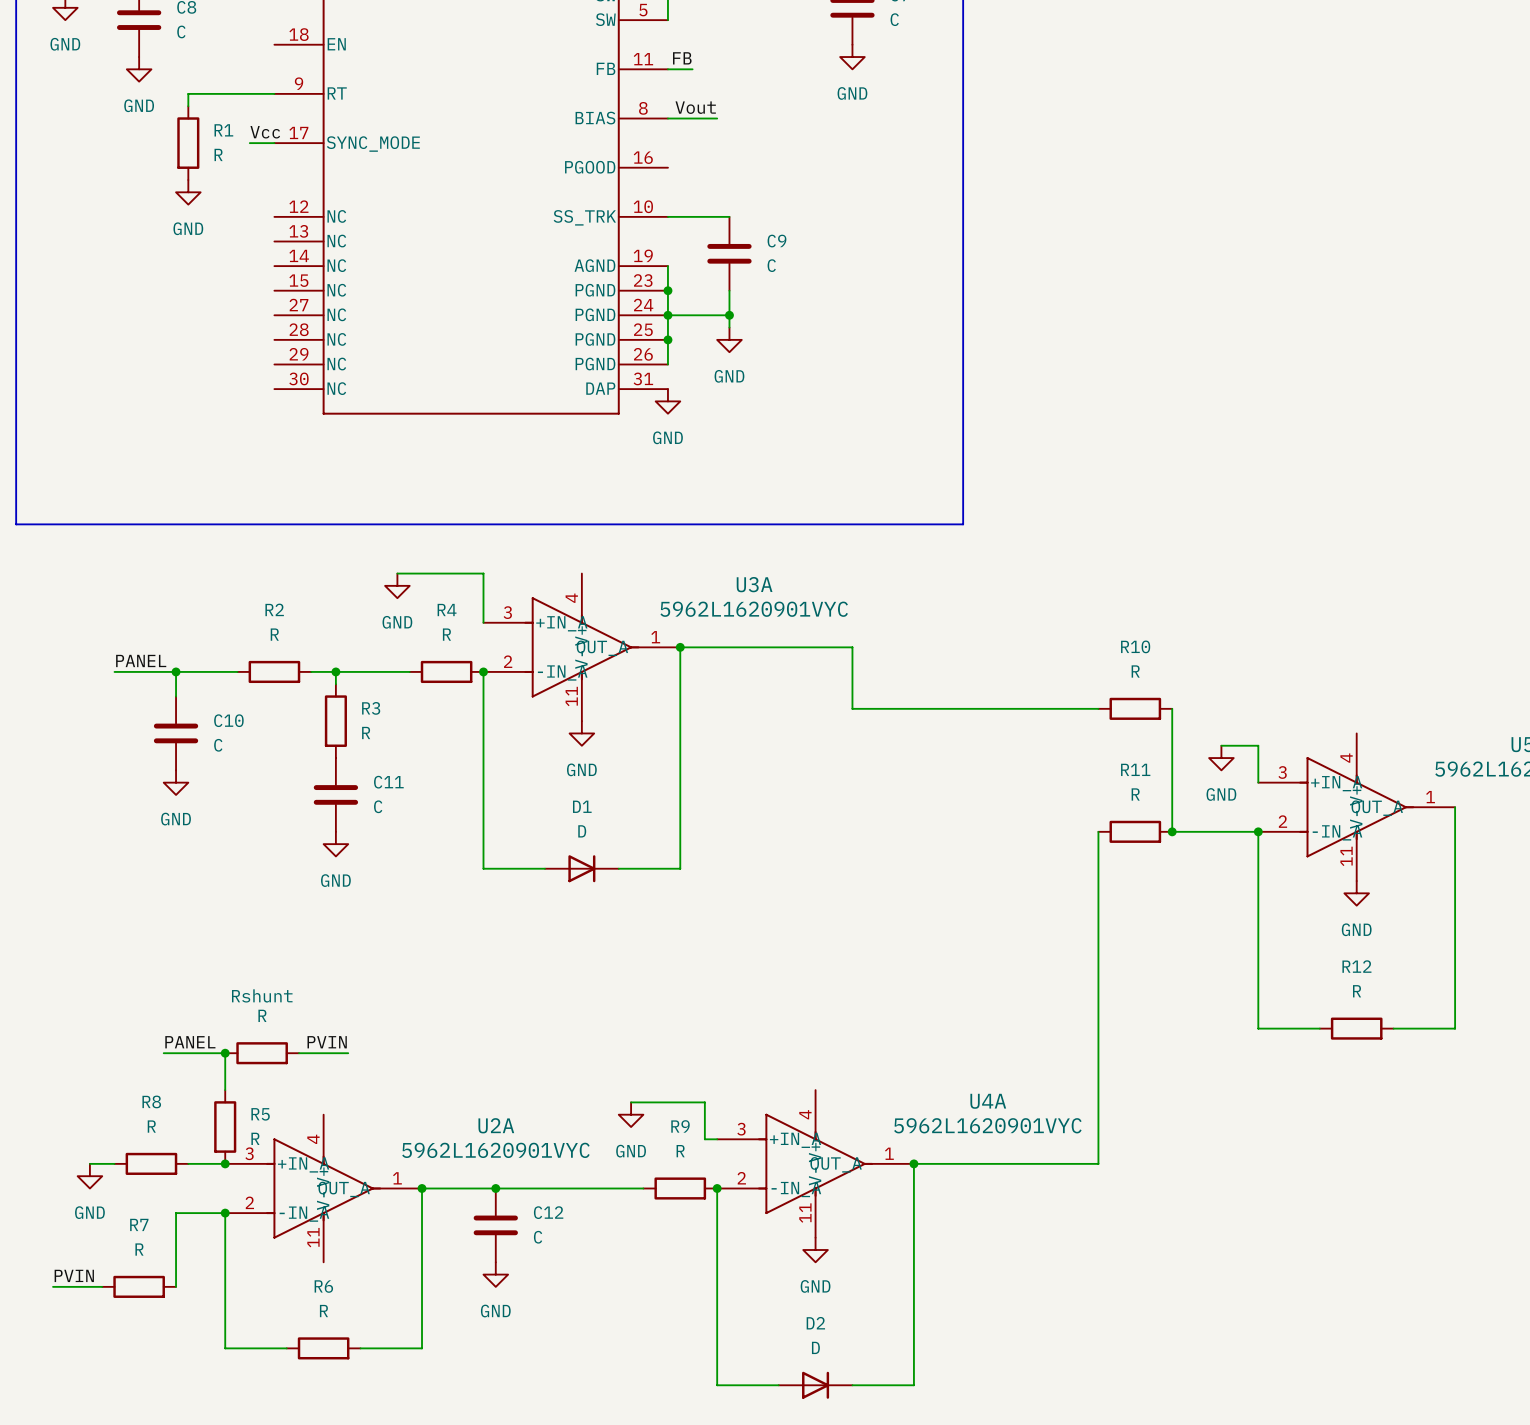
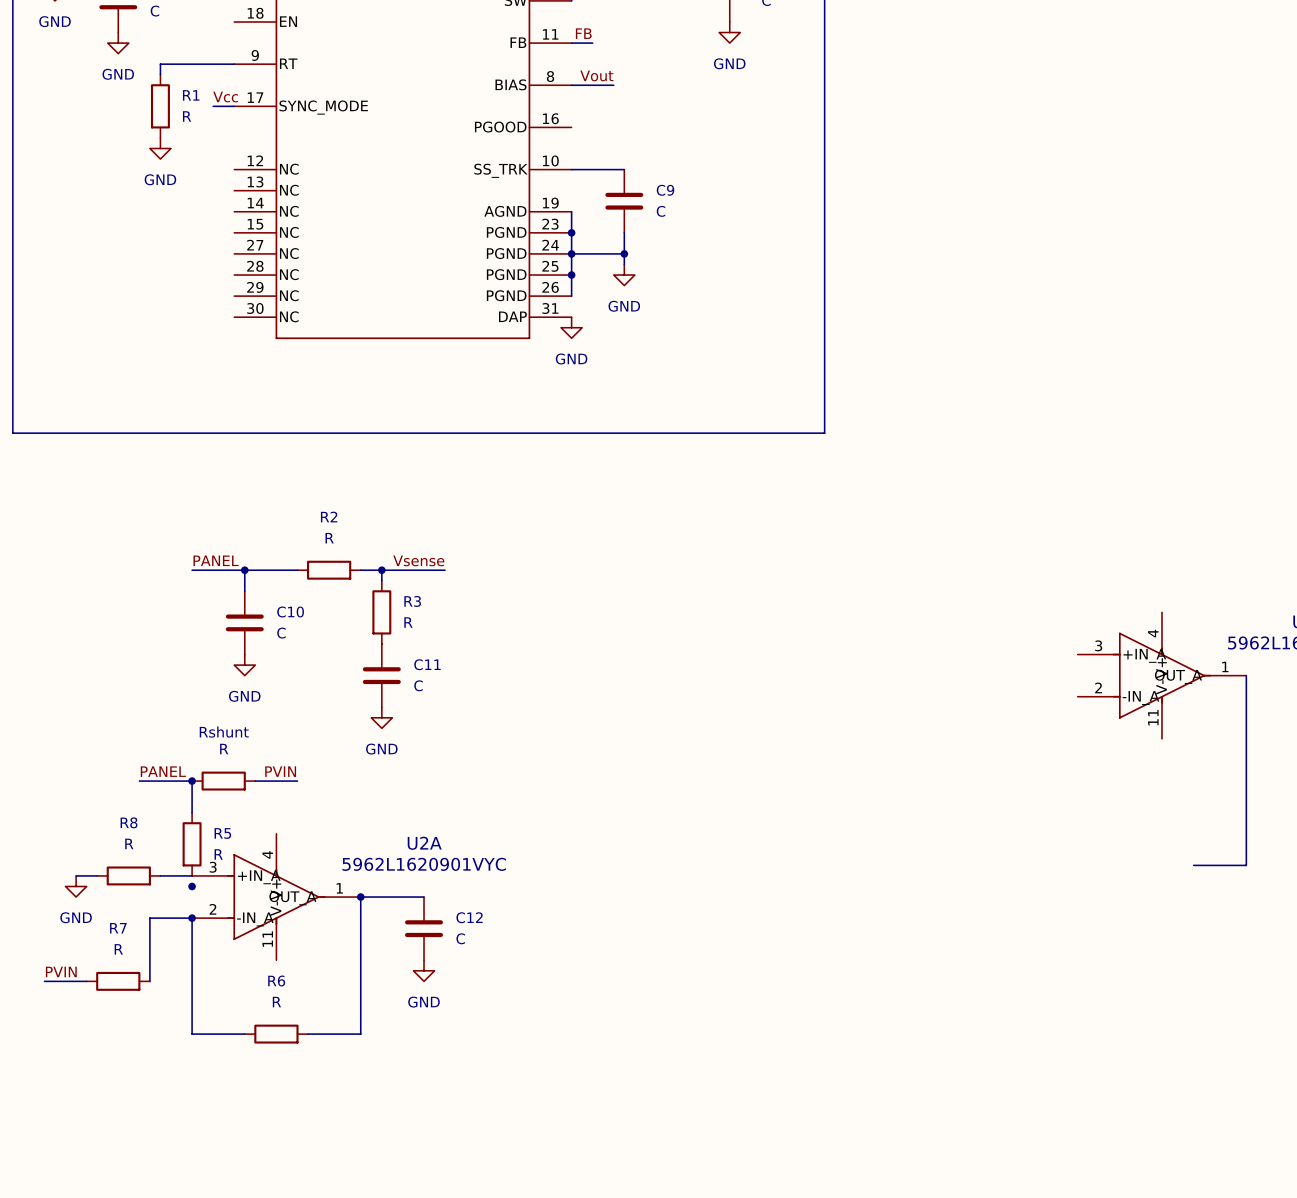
wire: (397, 573) (483, 573) (483, 622) -> none
power symbol: GND (397, 585) -> none
U3A: 5962L1620901VYC (581, 647) -> none
junction: (680, 647) -> none
label position: PANEL (141, 660) -> PANEL (216, 560)
wire: (114, 671) (237, 671) -> (192, 570) (297, 570)
wire: (176, 671) (176, 696) -> (244, 570) (244, 591)
junction: (176, 671) -> none
R2 position: (274, 671) -> (329, 570)
wire: (311, 671) (409, 671) -> (360, 570) (445, 570)
wire: (335, 671) (335, 684) -> (381, 570) (381, 580)
junction position: (335, 671) -> (244, 570)
R4: R (446, 671) -> none
wire: (483, 671) (483, 868) (544, 868) -> none
junction position: (483, 671) -> (381, 570)
label: none -> Vsense (418, 560)
wire: (1098, 708) (852, 708) (852, 647) (680, 647) (680, 868) (618, 868) -> none
R10: R (1135, 708) -> none
wire: (1172, 708) (1172, 831) (1258, 831) (1258, 1028) (1319, 1028) -> none
R3 position: (335, 721) -> (381, 612)
C10 position: (176, 733) -> (244, 622)
power symbol: GND (581, 733) -> none
wire: (1221, 745) (1258, 745) (1258, 782) -> none
power symbol: GND (1221, 758) -> none
power symbol: GND (176, 782) -> none
power symbol: none -> GND (244, 665)
C11 position: (335, 794) -> (381, 675)
wire: (1098, 831) (1098, 1163) (913, 1163) (913, 1385) (852, 1385) -> none
R11: R (1135, 831) -> none
junction: (1172, 831) -> none
junction: (1258, 831) -> none
power symbol: GND (335, 844) -> none
power symbol: none -> GND (381, 717)
D1: D (581, 868) -> none
power symbol: GND (1356, 893) -> none
junction: none -> (192, 781)
R12: R (1356, 1028) -> none
wire: none -> (76, 875) (97, 875)
label position: PANEL (190, 1042) -> PANEL (163, 771)
label position: PVIN (327, 1042) -> PVIN (280, 771)
wire: (163, 1053) (225, 1053) (225, 1090) -> (139, 781) (192, 781) (192, 812)
Rshunt position: (262, 1053) -> (223, 781)
wire: (299, 1053) (348, 1053) -> (255, 781) (297, 781)
junction: none -> (360, 897)
junction: none -> (192, 918)
wire: (631, 1102) (704, 1102) (704, 1139) (717, 1139) -> none
power symbol: GND (631, 1114) -> none
R5 position: (225, 1127) -> (192, 844)
power symbol: none -> GND (424, 970)
wire: none -> (44, 981) (76, 981)
R8 position: (151, 1163) -> (128, 875)
wire: (188, 1163) (225, 1163) -> (160, 875) (192, 875)
junction: (225, 1163) -> none
U4A: 5962L1620901VYC (815, 1163) -> none
junction: (913, 1163) -> none
power symbol position: GND (89, 1176) -> GND (76, 886)
U2A position: (323, 1188) -> (276, 897)
wire: (422, 1188) (643, 1188) -> (360, 1002) (360, 897) (424, 897)
junction: (422, 1188) -> none
junction: (495, 1188) -> none
R9: R (680, 1188) -> none
wire: (717, 1188) (717, 1385) (778, 1385) -> none
junction: (717, 1188) -> none
wire: (225, 1213) (176, 1213) (176, 1286) -> (192, 1023) (192, 918) (149, 918) (149, 981)
junction: (225, 1213) -> none
wire: (225, 1225) (225, 1348) (286, 1348) -> (192, 1034) (244, 1034)
wire: (422, 1225) (422, 1348) (360, 1348) -> (360, 1034) (308, 1034)
C12 position: (495, 1225) -> (424, 928)
power symbol: GND (815, 1249) -> none
power symbol: GND (495, 1274) -> none
label position: PVIN (74, 1275) -> PVIN (61, 971)
wire: (53, 1286) (102, 1286) -> none
R7 position: (139, 1286) -> (118, 981)
R6 position: (323, 1348) -> (276, 1034)
D2: D (815, 1385) -> none

